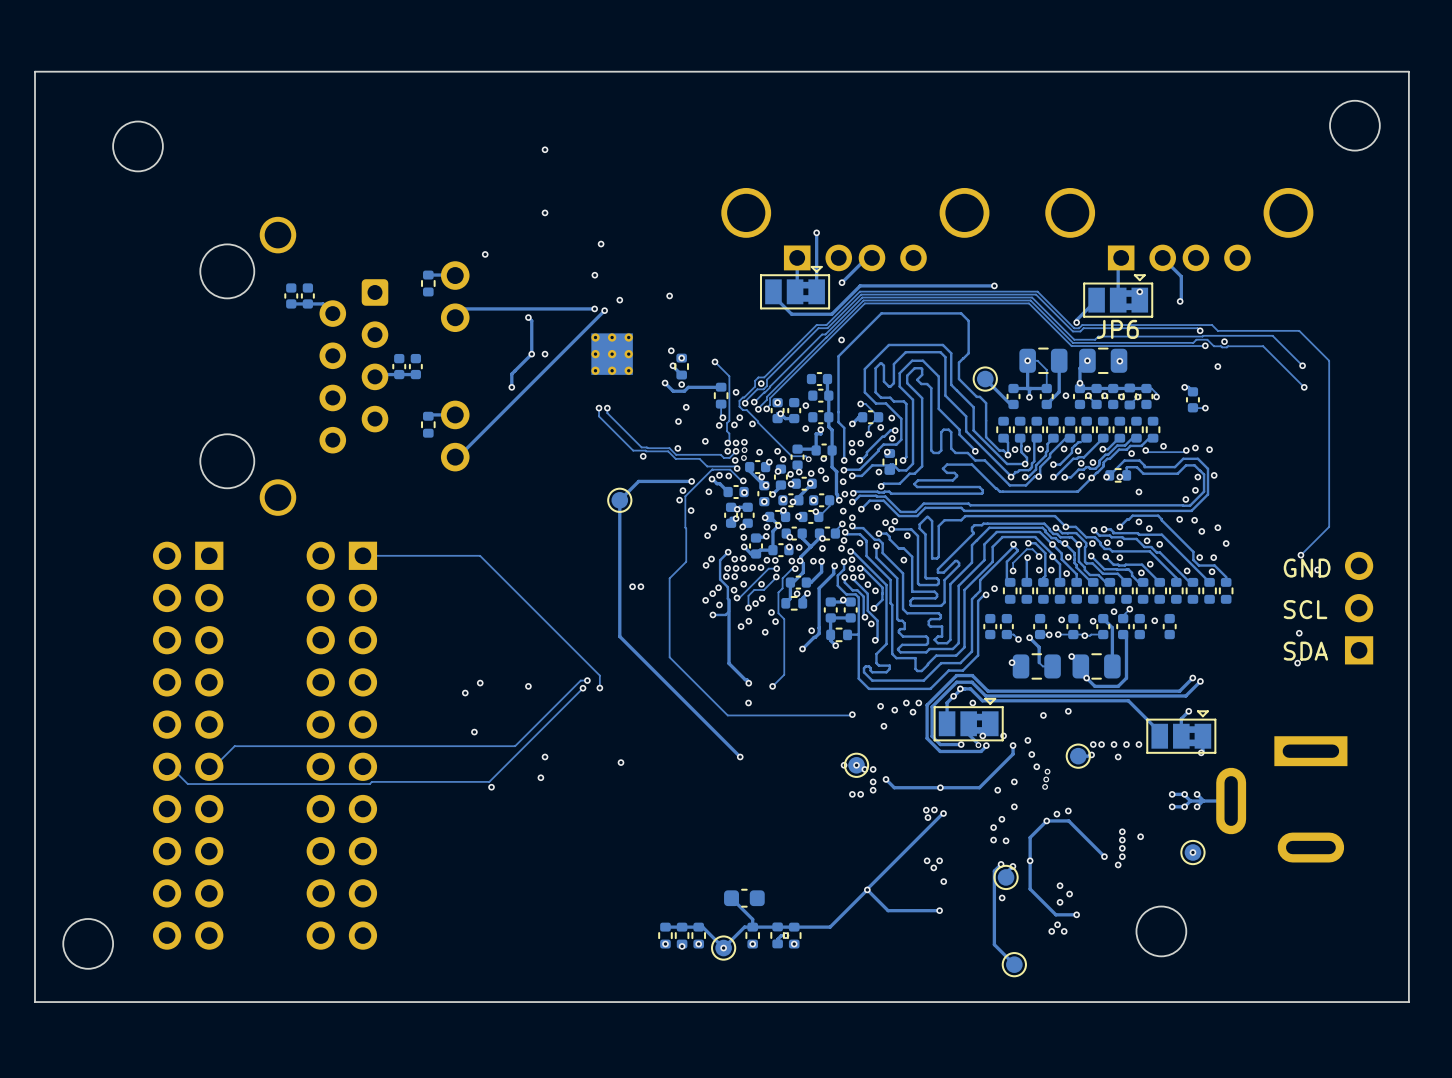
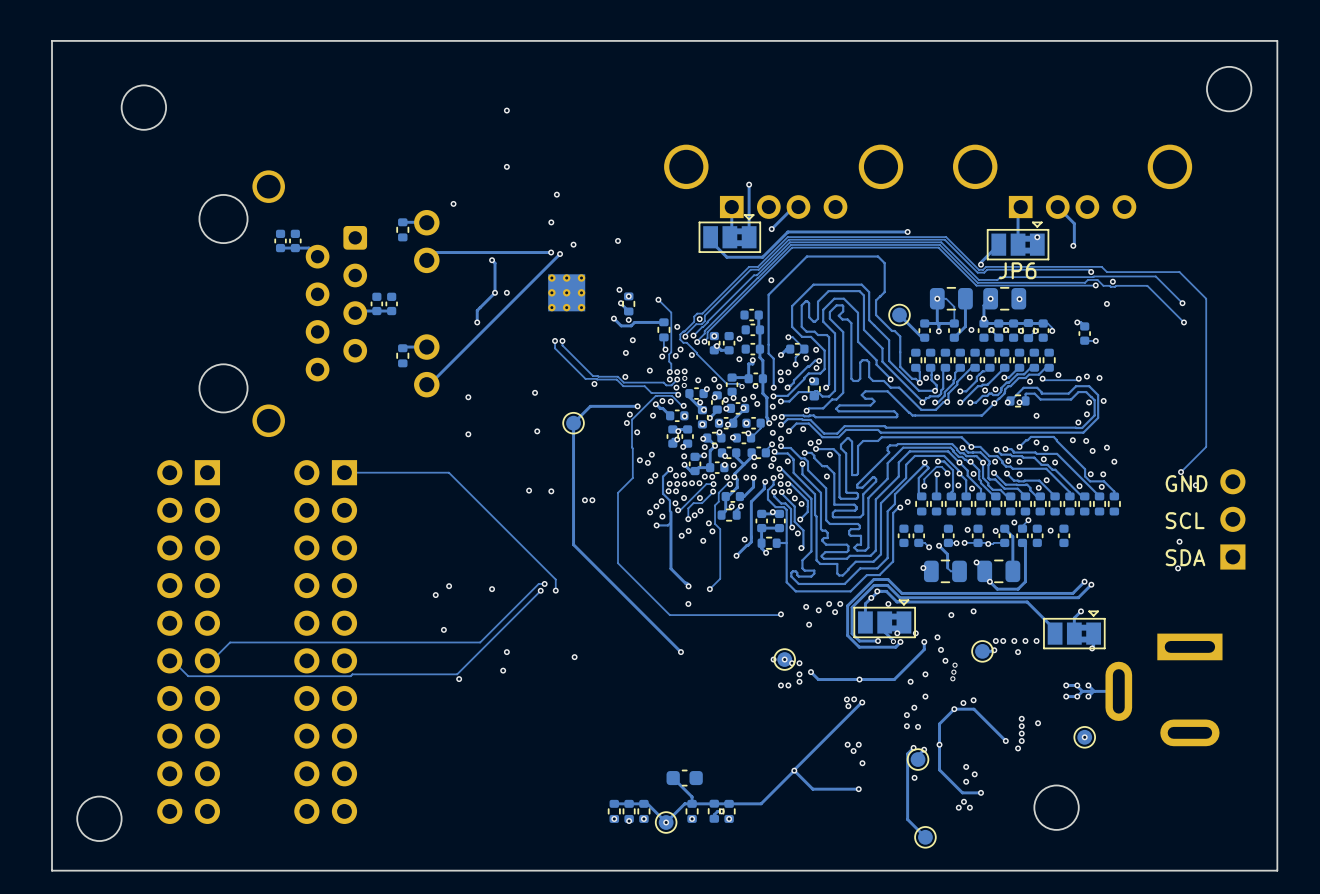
via: none -> (535, 392)
via: none -> (468, 397)
via: none -> (537, 431)
via: none -> (468, 434)
via: (713, 527) -> none
via: none -> (639, 460)
via: none -> (647, 462)
via: none -> (529, 490)
via: none -> (551, 491)

